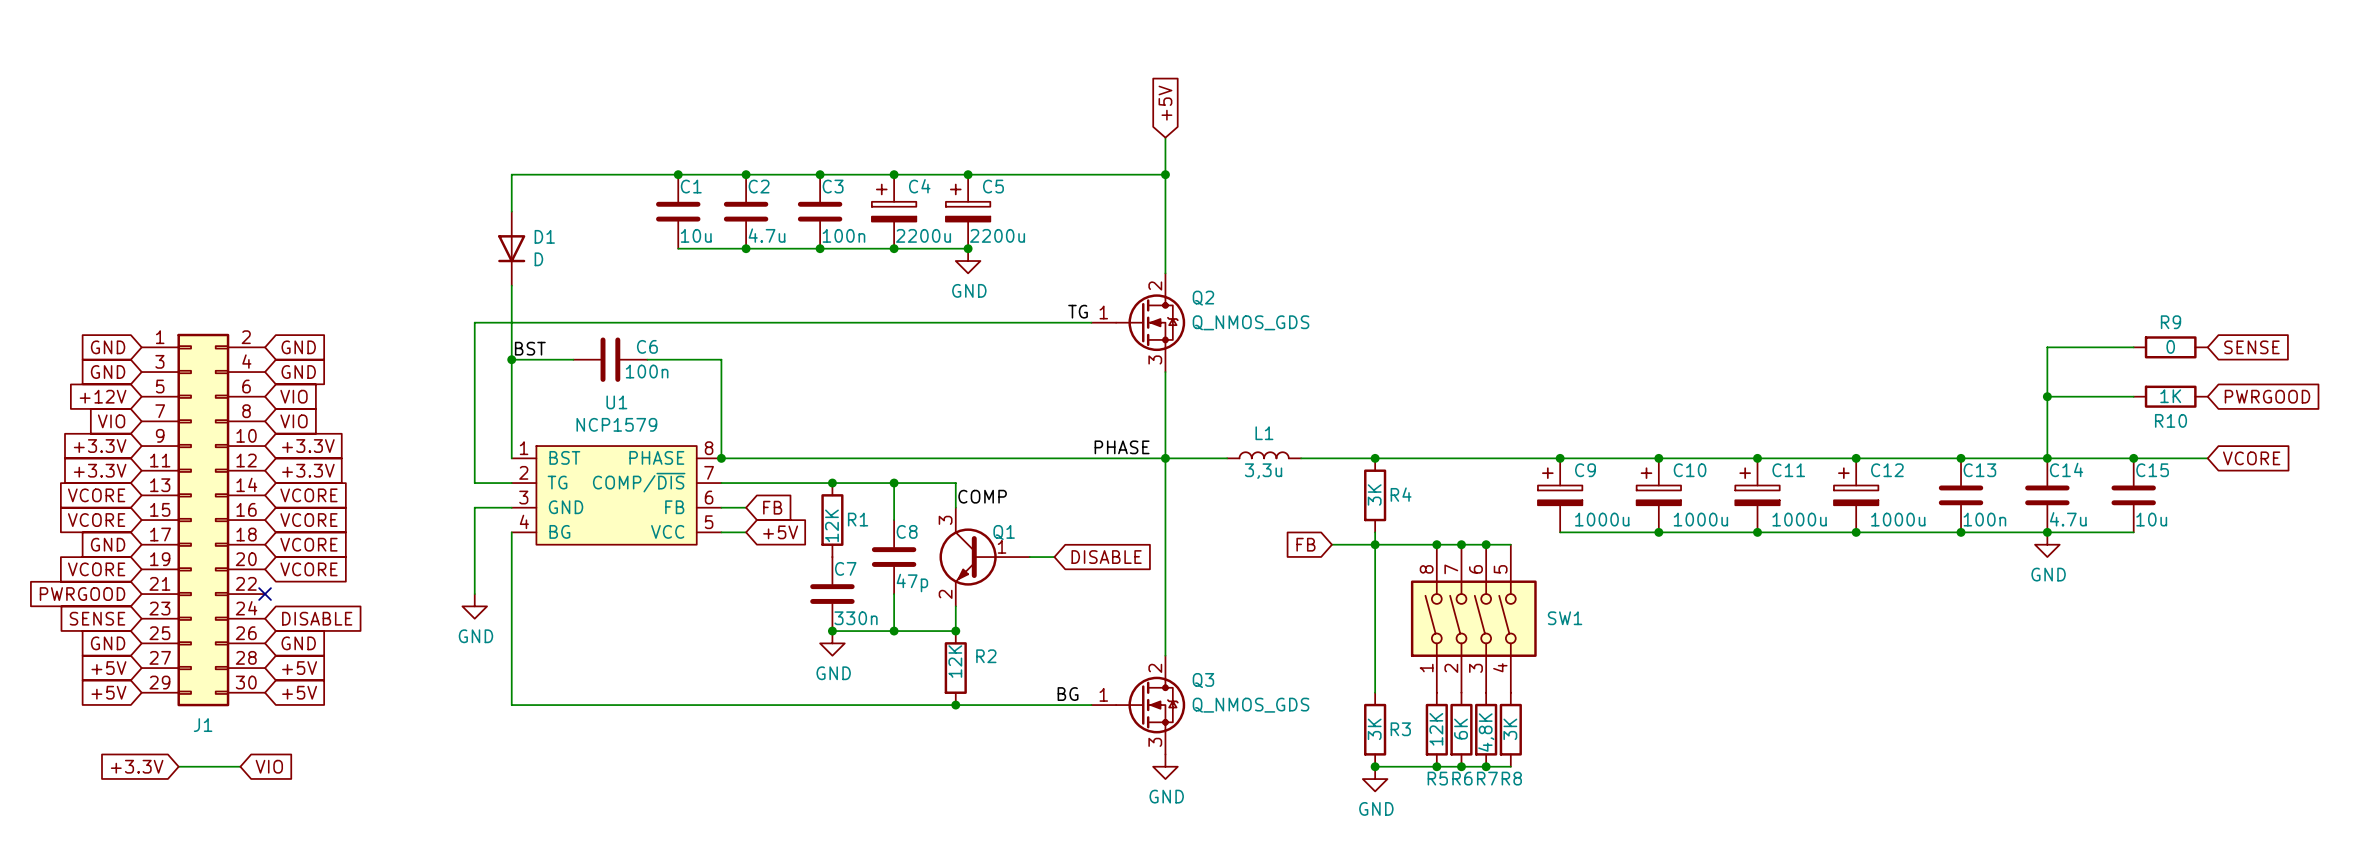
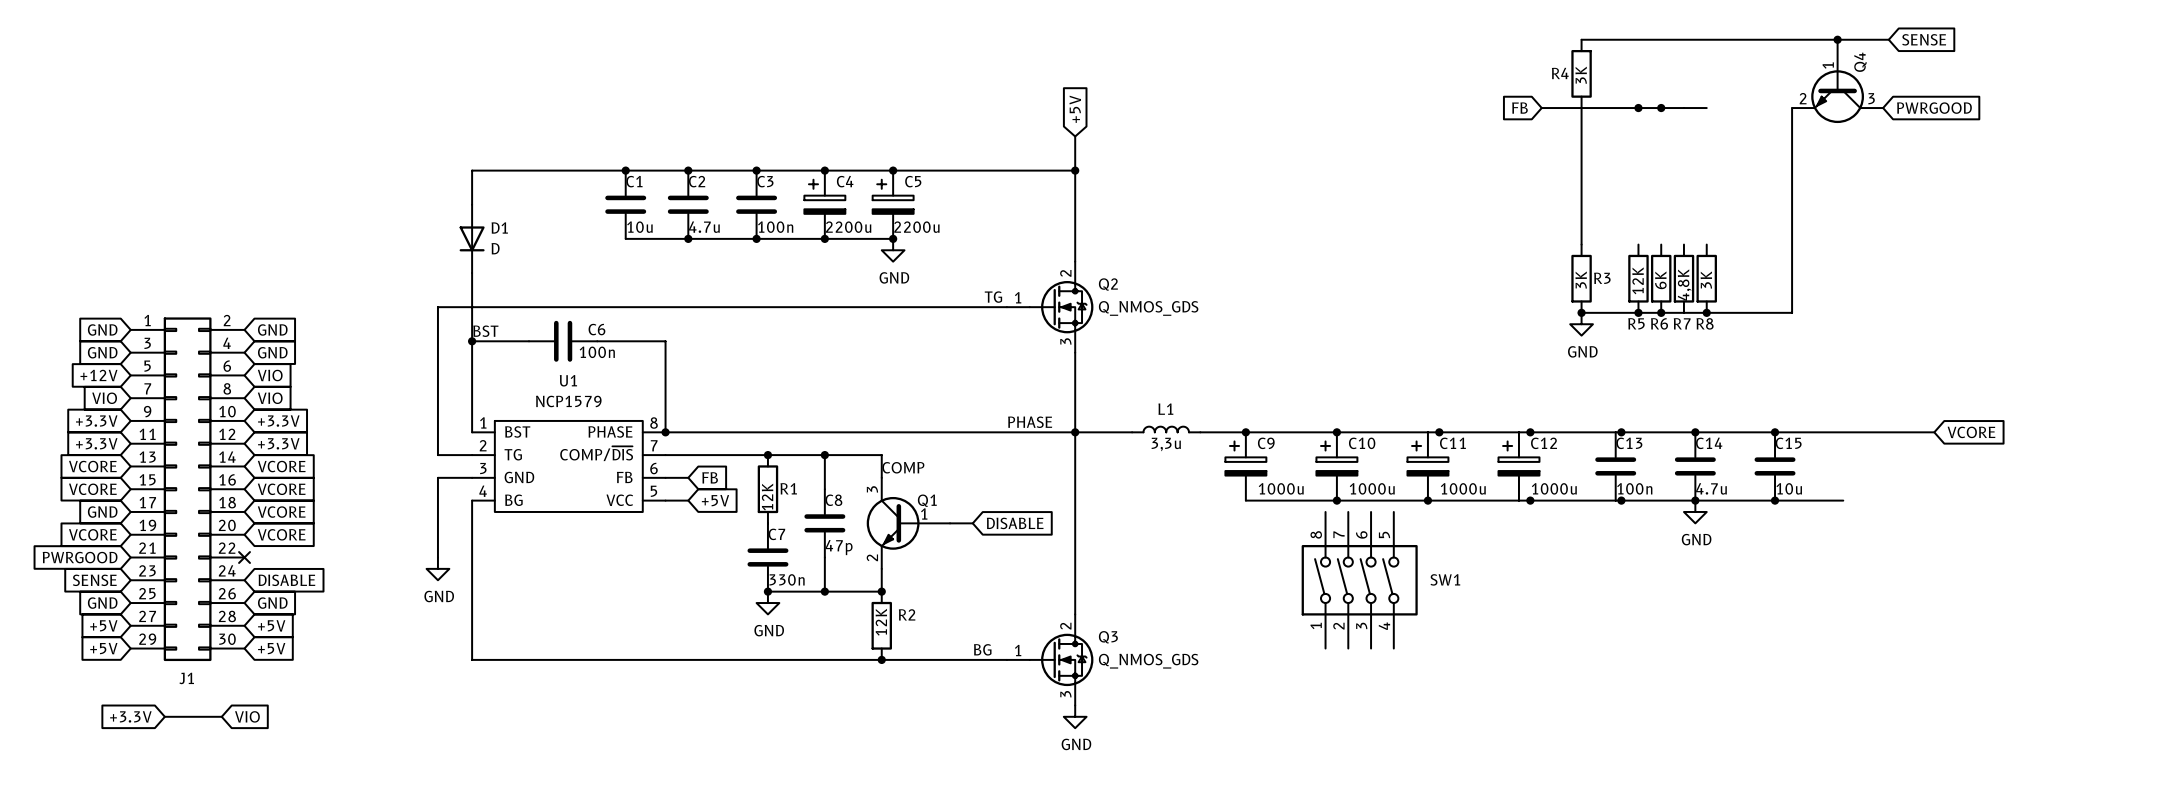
wire: none -> (1581, 39) (1888, 39)
junction: none -> (1837, 39)
global label: none -> SENSE (1924, 39)
Q4: none -> (1837, 81)
global label: none -> FB (1519, 108)
wire: none -> (1541, 108) (1706, 108)
wire: none -> (1581, 108) (1581, 244)
junction: none -> (1638, 108)
junction: none -> (1661, 108)
wire: none -> (1792, 108) (1792, 312) (1581, 312)
global label: none -> PWRGOOD (1934, 108)
junction: none -> (1581, 312)
junction: none -> (1638, 312)
junction: none -> (1661, 312)
junction: none -> (1706, 312)
power symbol: none -> GND (1581, 324)
wire: (2133, 347) (2047, 347) (2047, 458) -> none
R9: 0 (2170, 347) -> none
global label: SENSE (2251, 347) -> none
wire: (2047, 396) (2133, 396) -> none
junction: (2047, 396) -> none
R10: 1K (2170, 396) -> none
global label: PWRGOOD (2267, 396) -> none
junction position: (1375, 458) -> (1245, 432)
junction: none -> (1336, 432)
junction position: (1856, 458) -> (1695, 432)
junction: none -> (1775, 432)
junction: (1961, 458) -> none
junction: (2047, 458) -> none
wire: (2096, 458) (2207, 458) -> none
junction: (2133, 458) -> none
global label position: VCORE (2251, 458) -> VCORE (1971, 432)
R4 name position: R4 (1401, 494) -> R4 (1560, 73)
R4 position: (1375, 495) -> (1581, 73)
C9 position: (1560, 495) -> (1245, 466)
C10 position: (1658, 495) -> (1336, 466)
C11 position: (1757, 495) -> (1427, 466)
C12 position: (1856, 495) -> (1518, 466)
C13 position: (1961, 495) -> (1615, 466)
C14 position: (2047, 495) -> (1695, 466)
C15 position: (2133, 495) -> (1775, 466)
wire: none -> (1245, 500) (1439, 500)
wire: (1375, 532) (1375, 692) -> none
junction: none -> (1336, 500)
junction: none -> (1427, 500)
junction position: (1856, 532) -> (1695, 500)
junction: none -> (1775, 500)
junction: (1961, 532) -> none
wire: (1998, 532) (2133, 532) -> none
junction: (2047, 532) -> none
global label: FB (1305, 544) -> none
wire: (1331, 544) (1510, 544) -> none
junction: (1375, 544) -> none
junction: (1436, 544) -> none
junction: (1461, 544) -> none
junction: (1486, 544) -> none
power symbol: none -> GND (1695, 511)
power symbol: GND (2047, 544) -> none
R3 position: (1375, 729) -> (1581, 278)
R5 position: (1436, 729) -> (1638, 278)
R6 position: (1461, 729) -> (1661, 278)
R7 position: (1486, 729) -> (1683, 278)
R8 position: (1510, 729) -> (1706, 278)
wire: (1375, 766) (1510, 766) -> none
junction: (1375, 766) -> none
junction: (1436, 766) -> none
junction: (1461, 766) -> none
junction: (1486, 766) -> none
power symbol: GND (1375, 779) -> none

